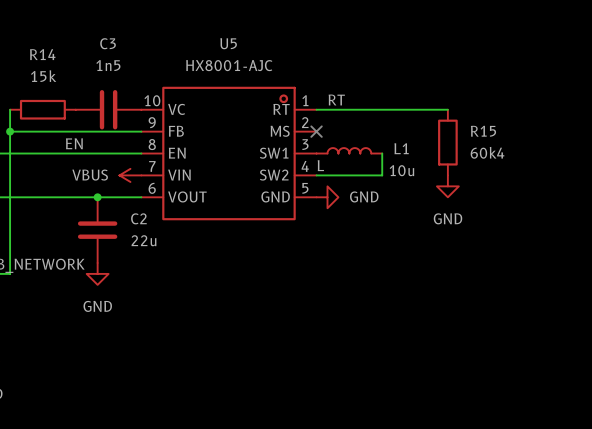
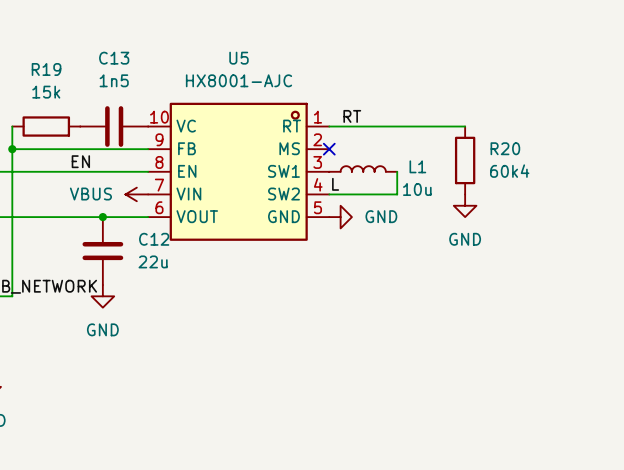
C3 name: C3 (108, 43) -> C13 (114, 58)
R14 name: R14 (42, 54) -> R19 (46, 69)
R15 name: R15 (483, 131) -> R20 (505, 148)
C2 name: C2 (138, 218) -> C12 (154, 239)

